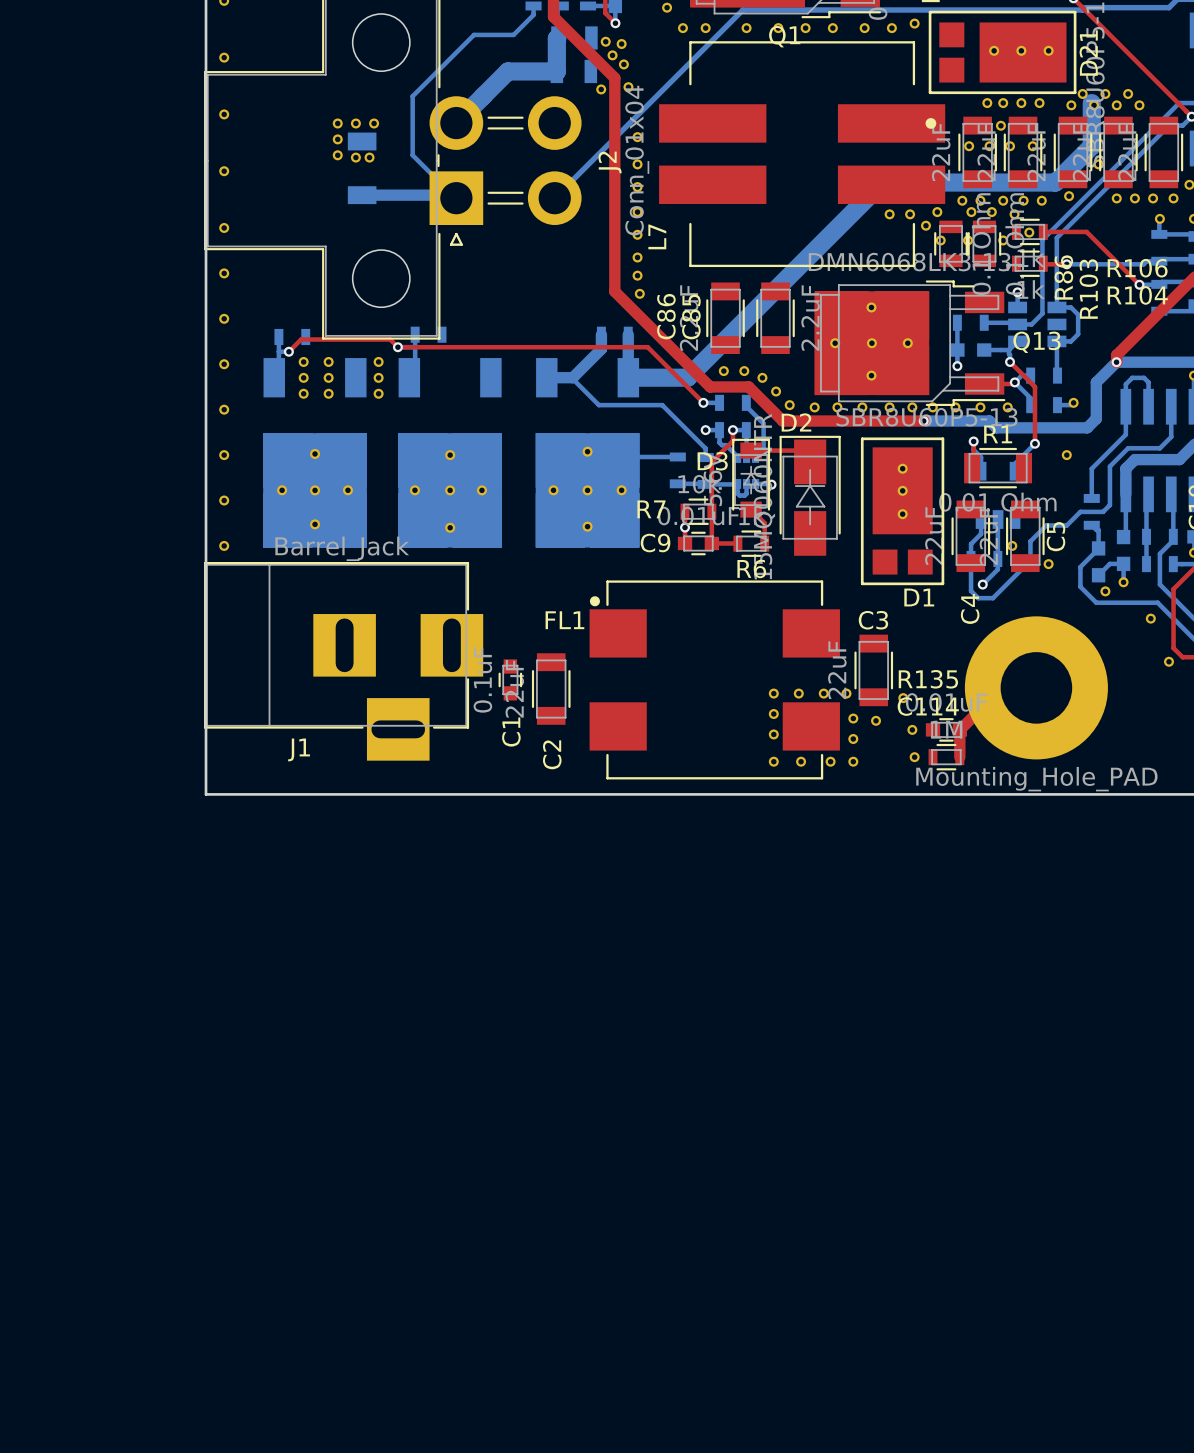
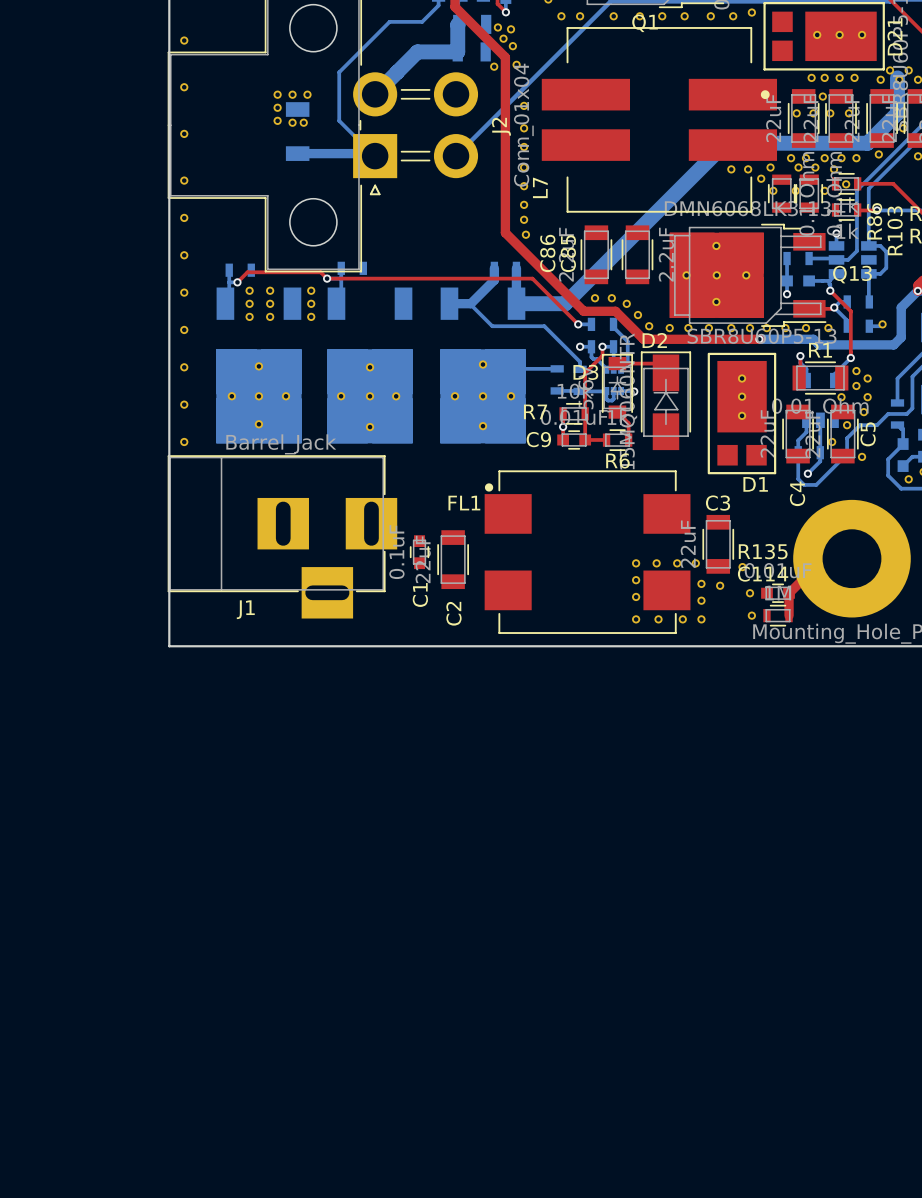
part: (1066, 455) -> none
part: none -> (856, 371)
part: none -> (867, 378)
part: none -> (856, 385)
part: none -> (841, 397)
part: none -> (867, 397)
part: none -> (863, 412)
part: none -> (847, 425)

